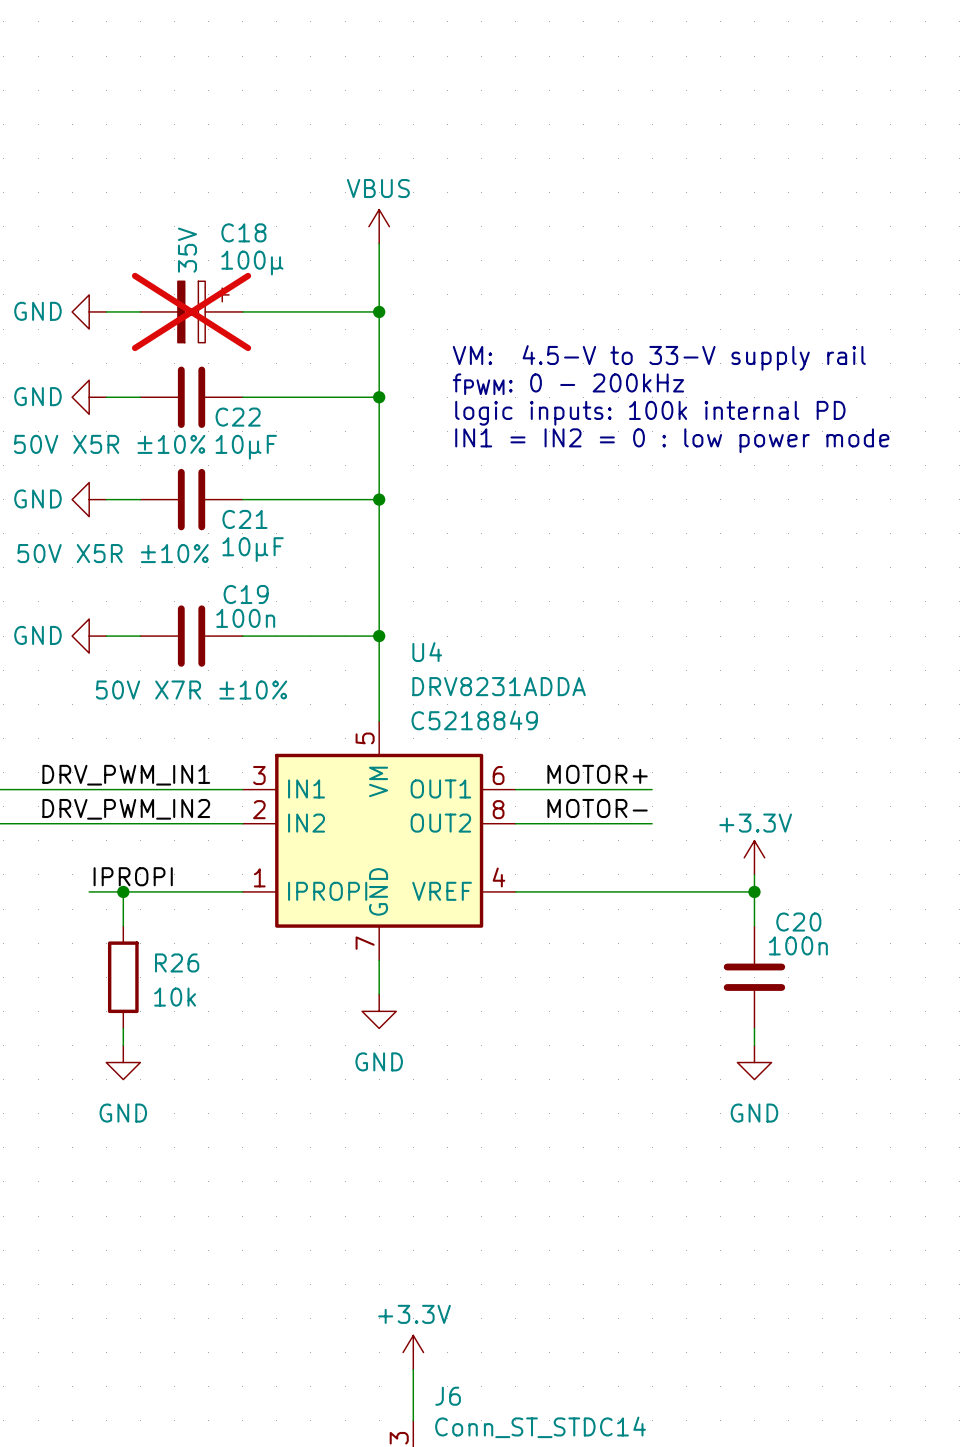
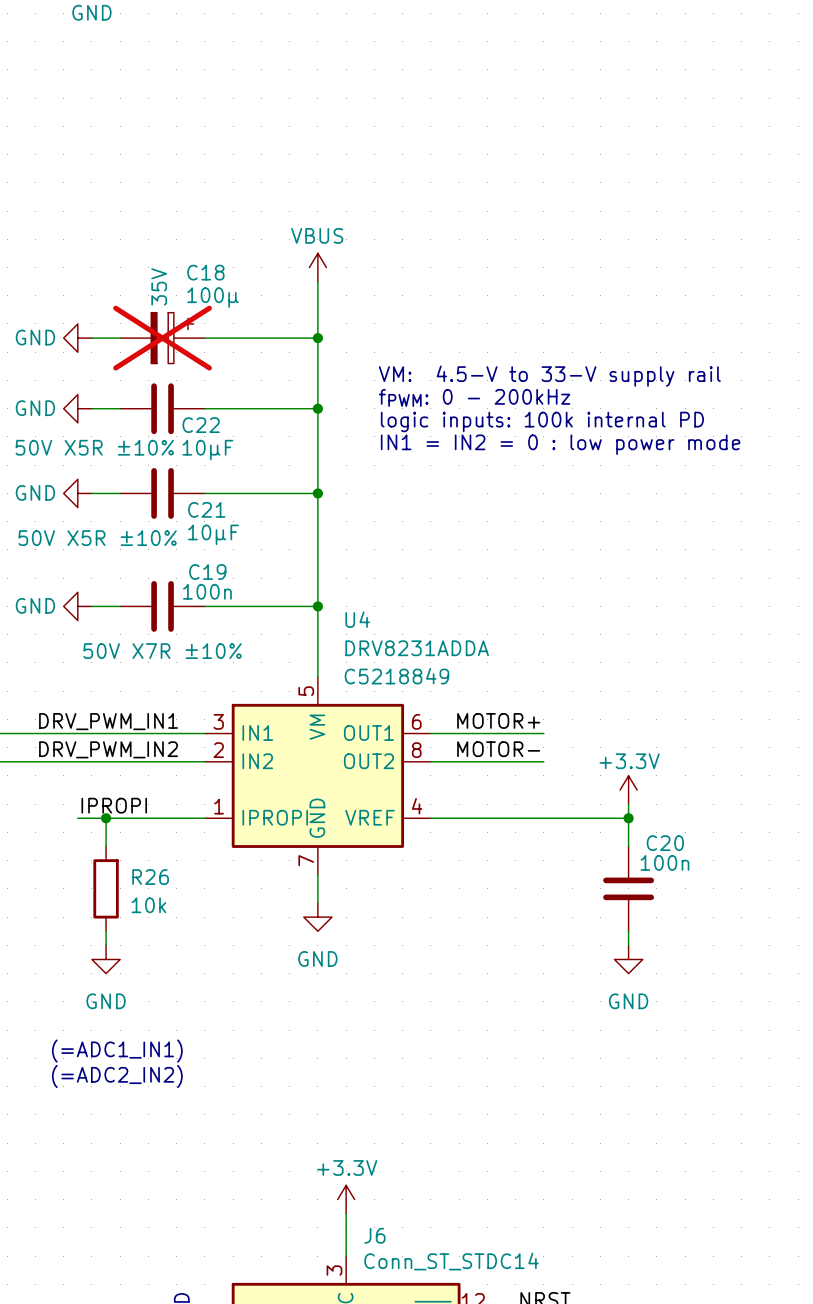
text: none -> (=ADC1_IN1) (117, 1051)
text: none -> (=ADC2_IN2) (117, 1076)

